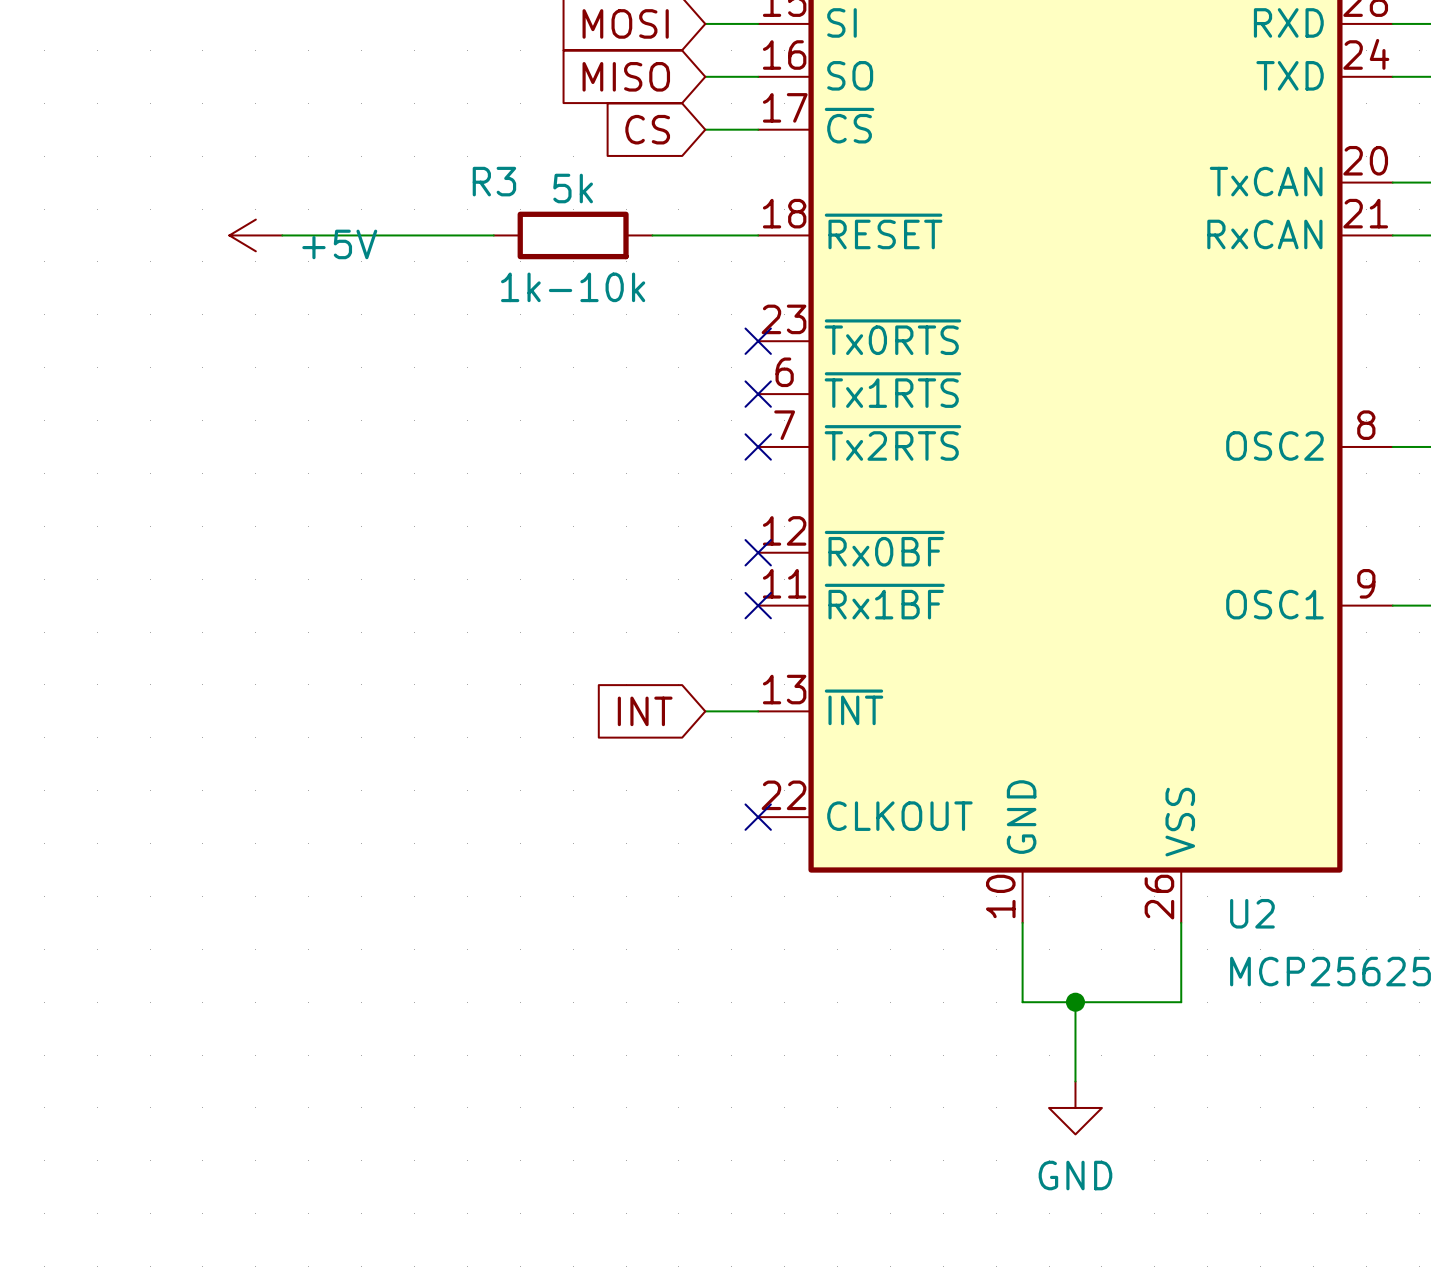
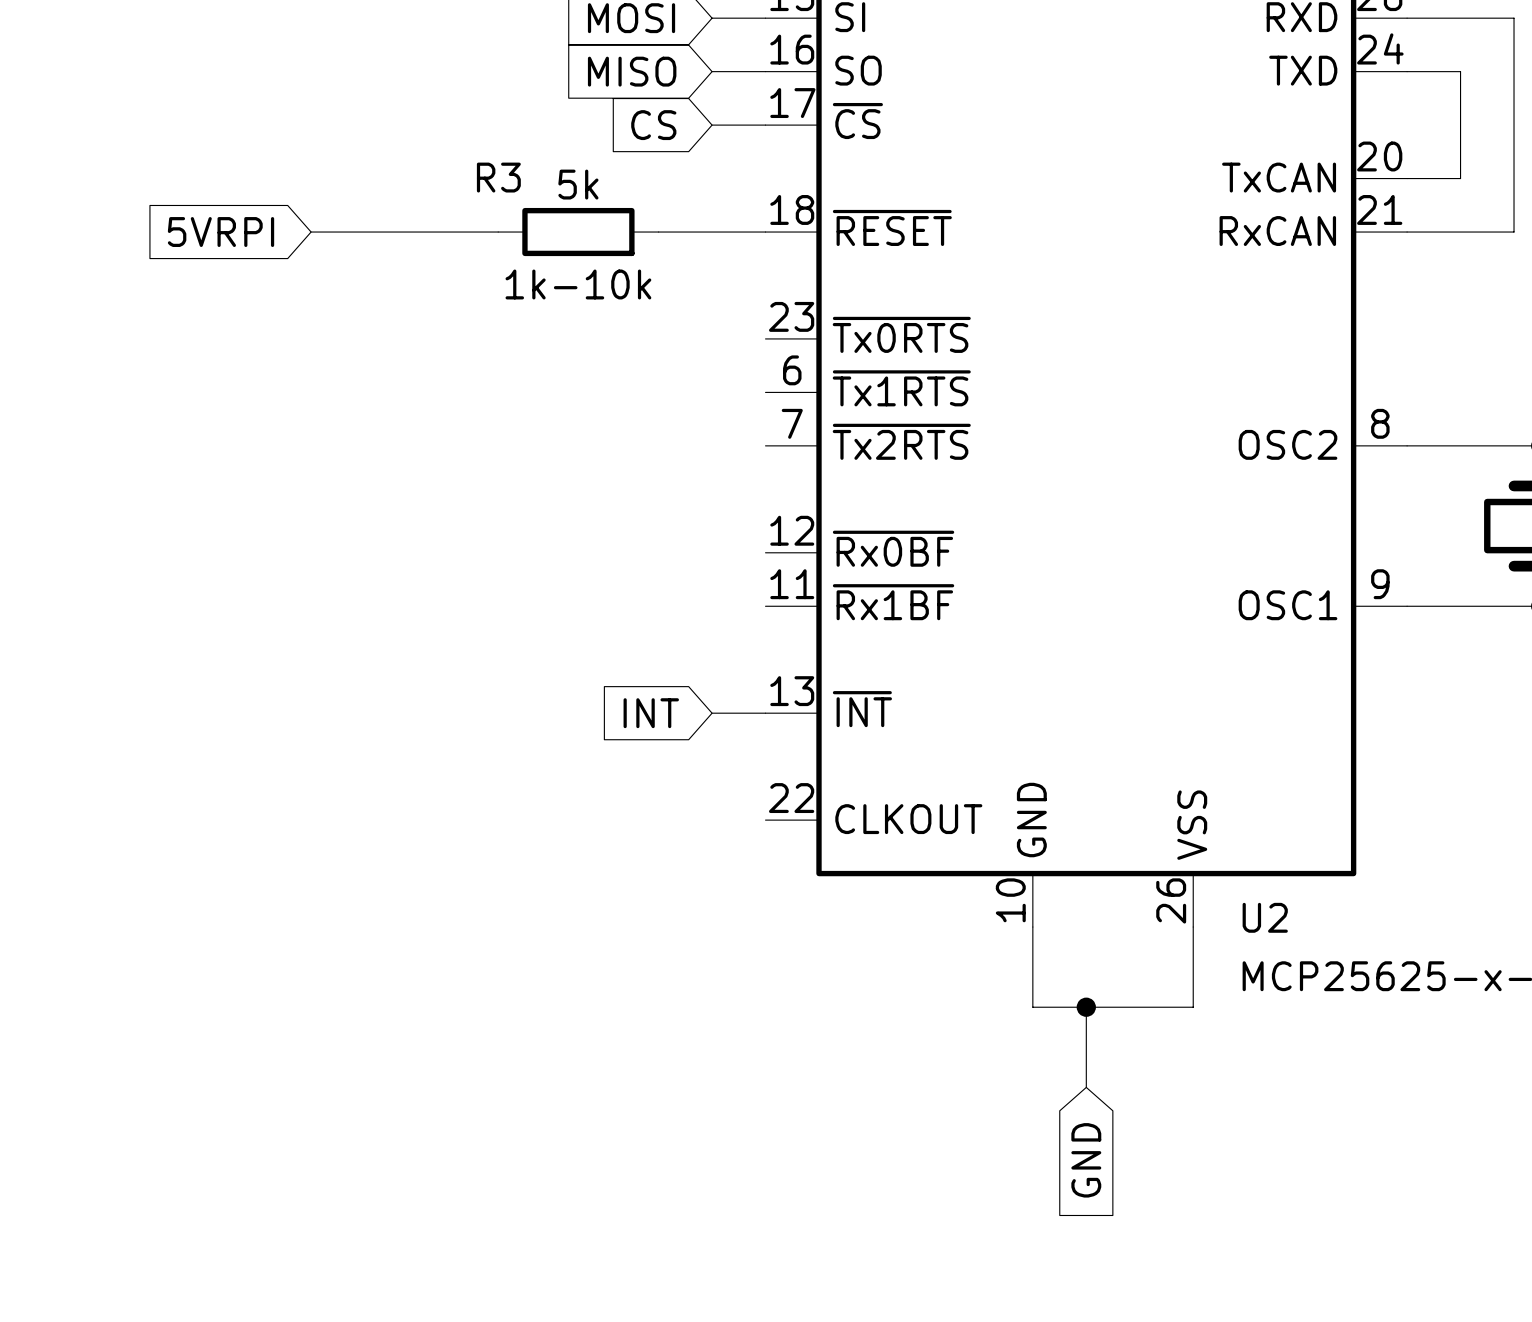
global label: none -> 5VRPI (221, 232)
power symbol: +5V (255, 235) -> none
wire: (282, 235) (308, 235) -> none
no-connect mark: (758, 341) -> none
no-connect mark: (758, 394) -> none
no-connect mark: (758, 446) -> none
no-connect mark: (758, 552) -> none
no-connect mark: (758, 605) -> none
no-connect mark: (758, 817) -> none
power symbol: GND (1075, 1107) -> none
global label: none -> GND (1086, 1160)

